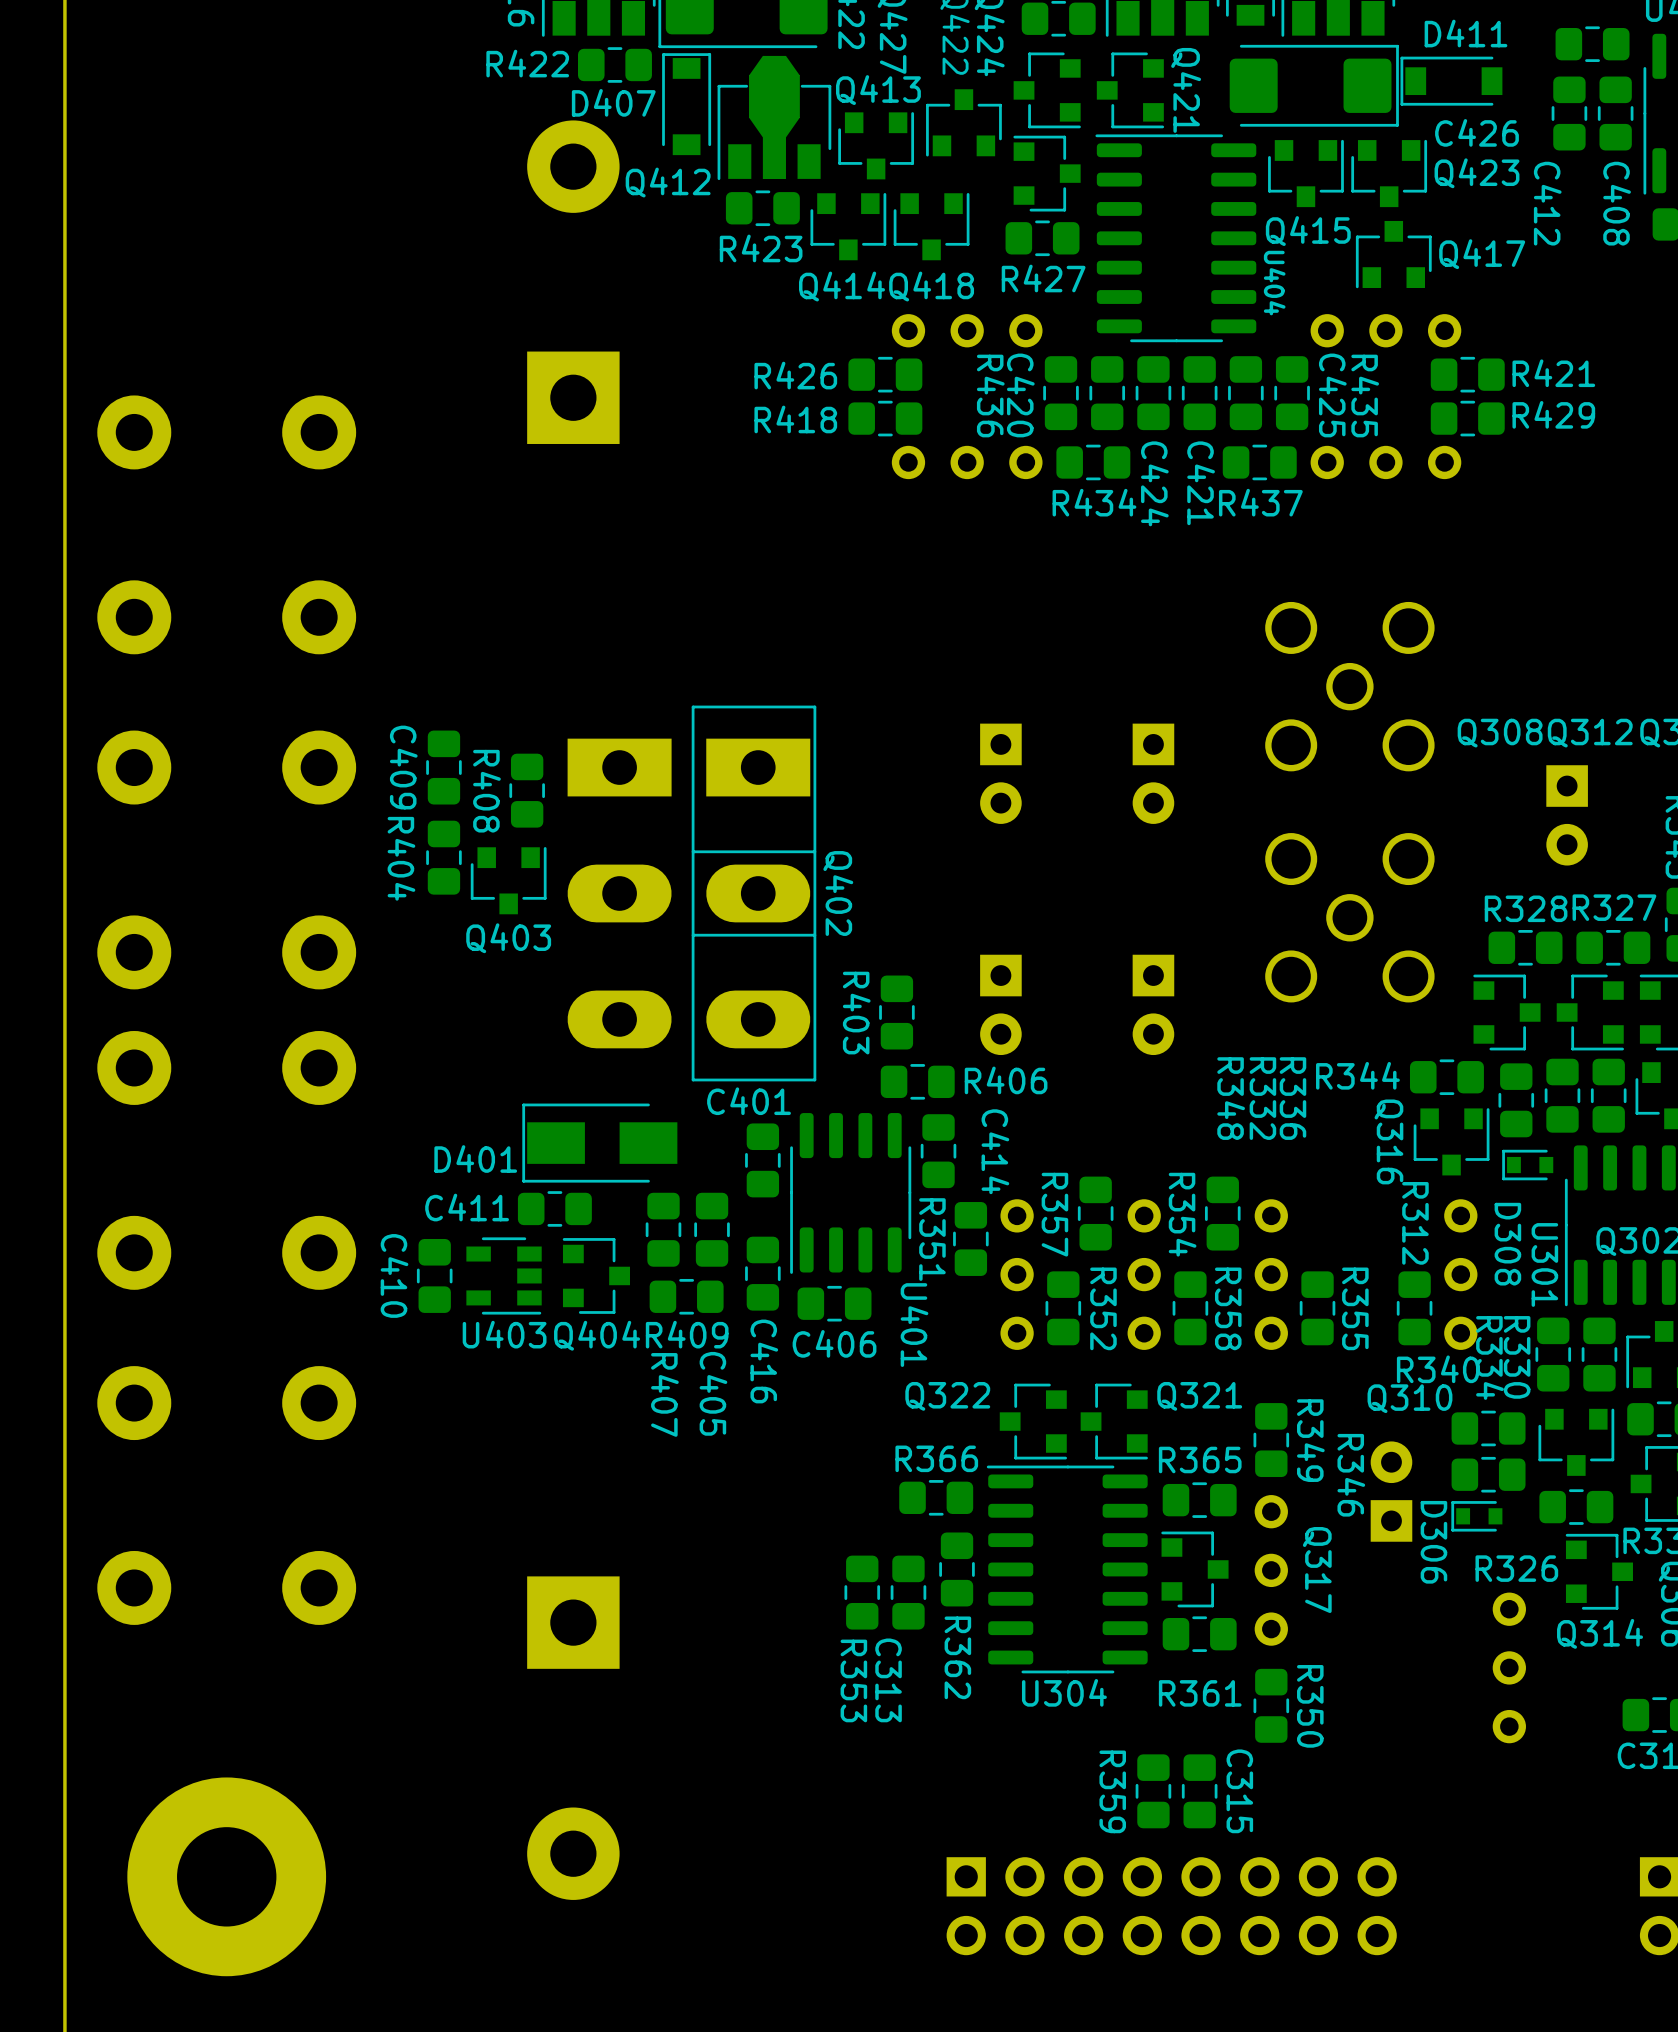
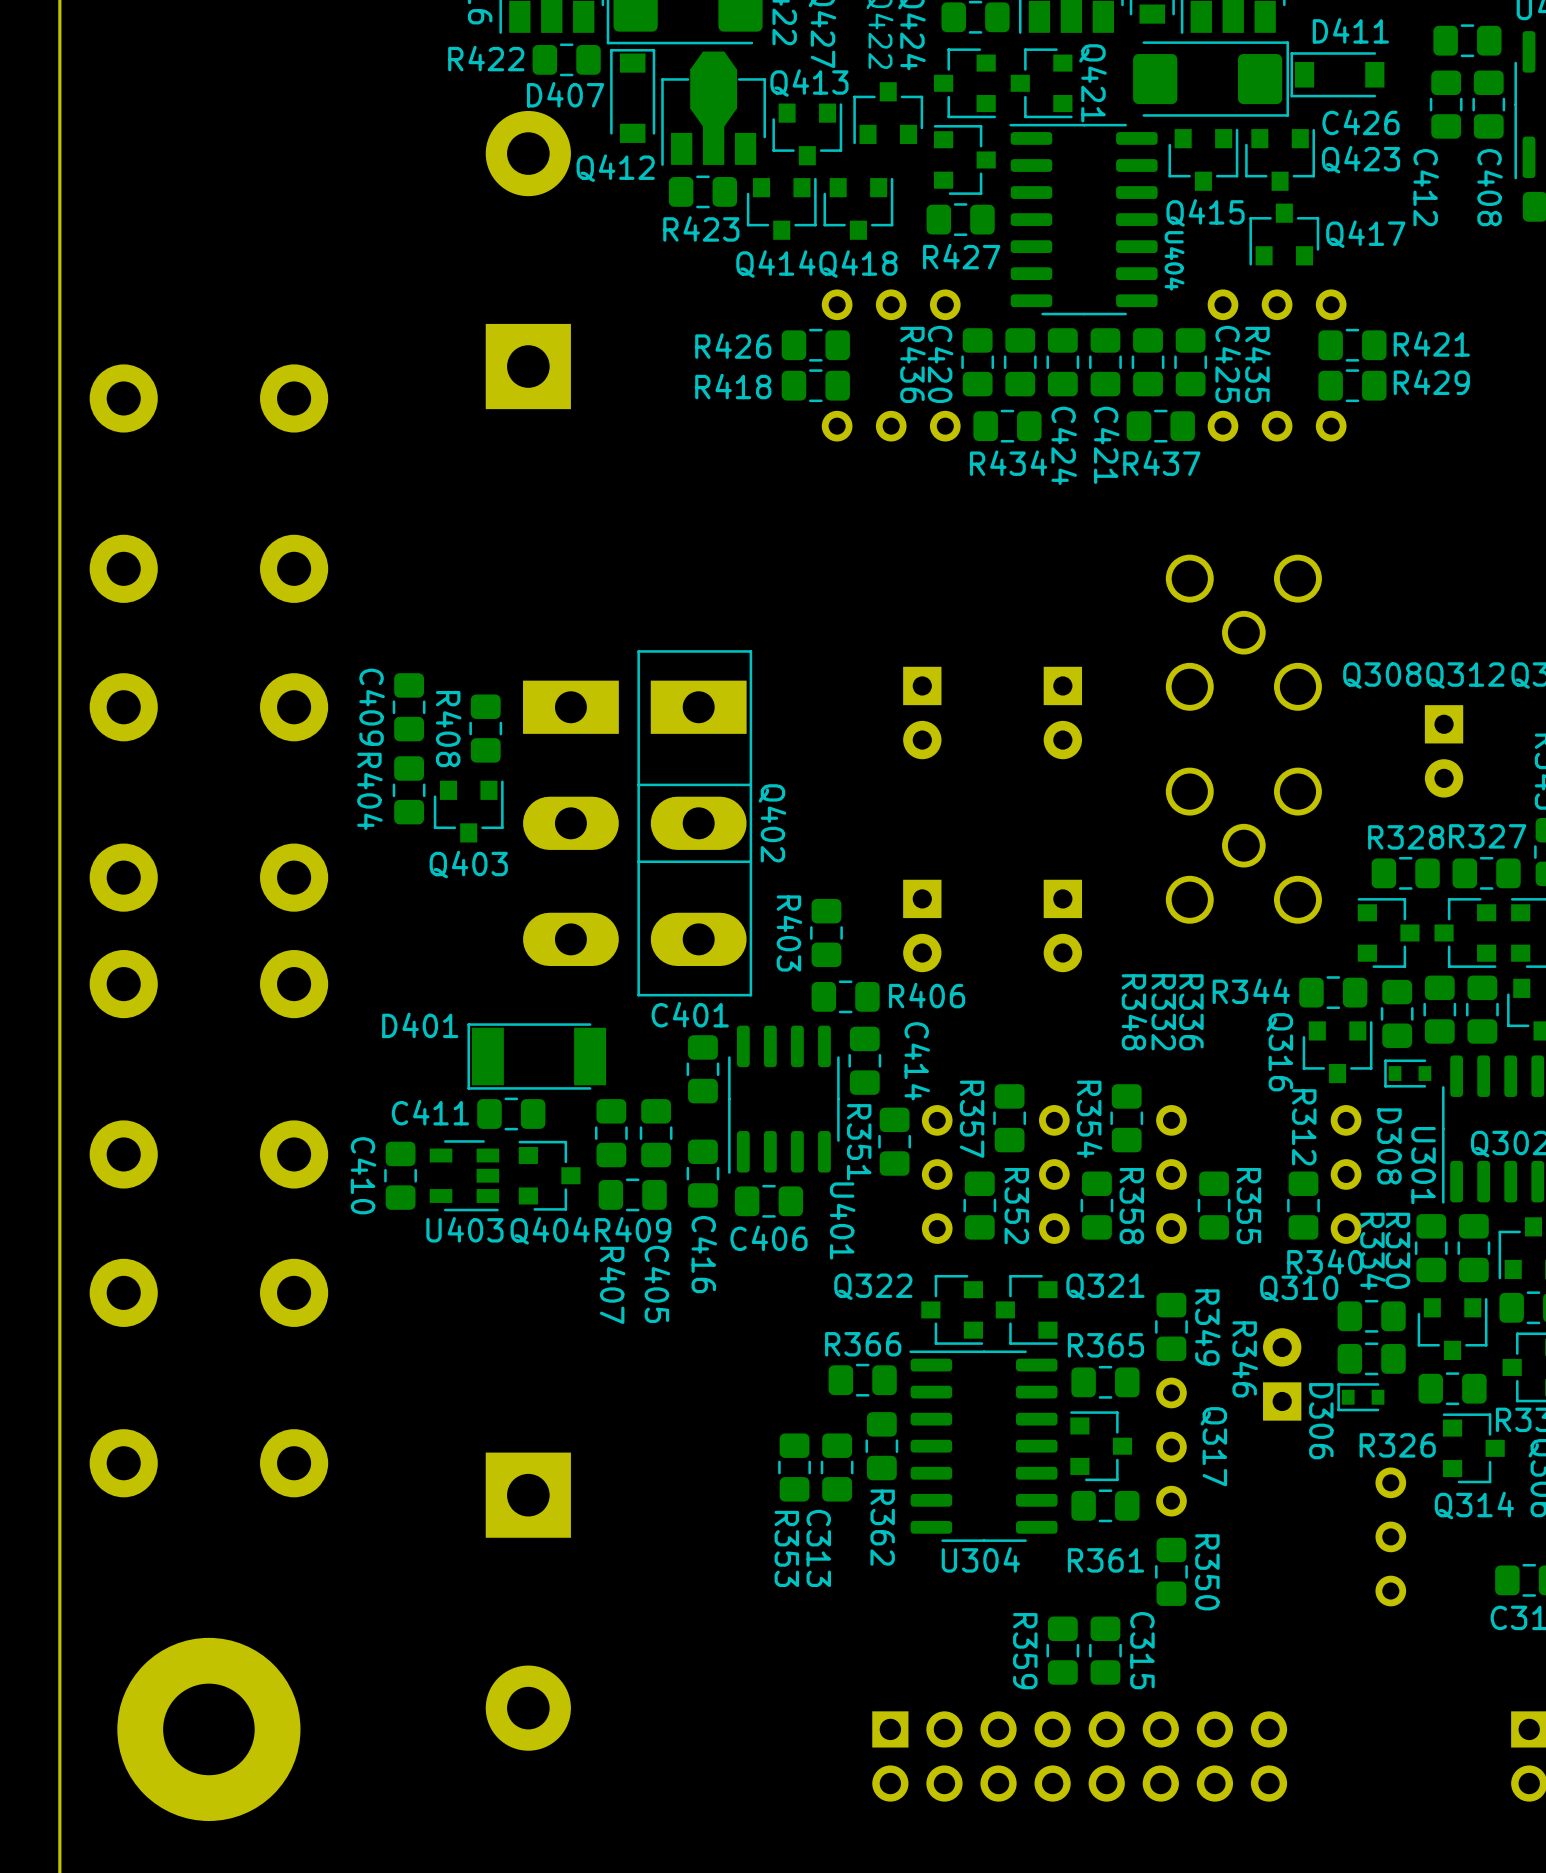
D401 footprint: [522, 1103, 678, 1183] -> [467, 1023, 607, 1090]
D401 name position: D401 (475, 1159) -> D401 (420, 1025)

